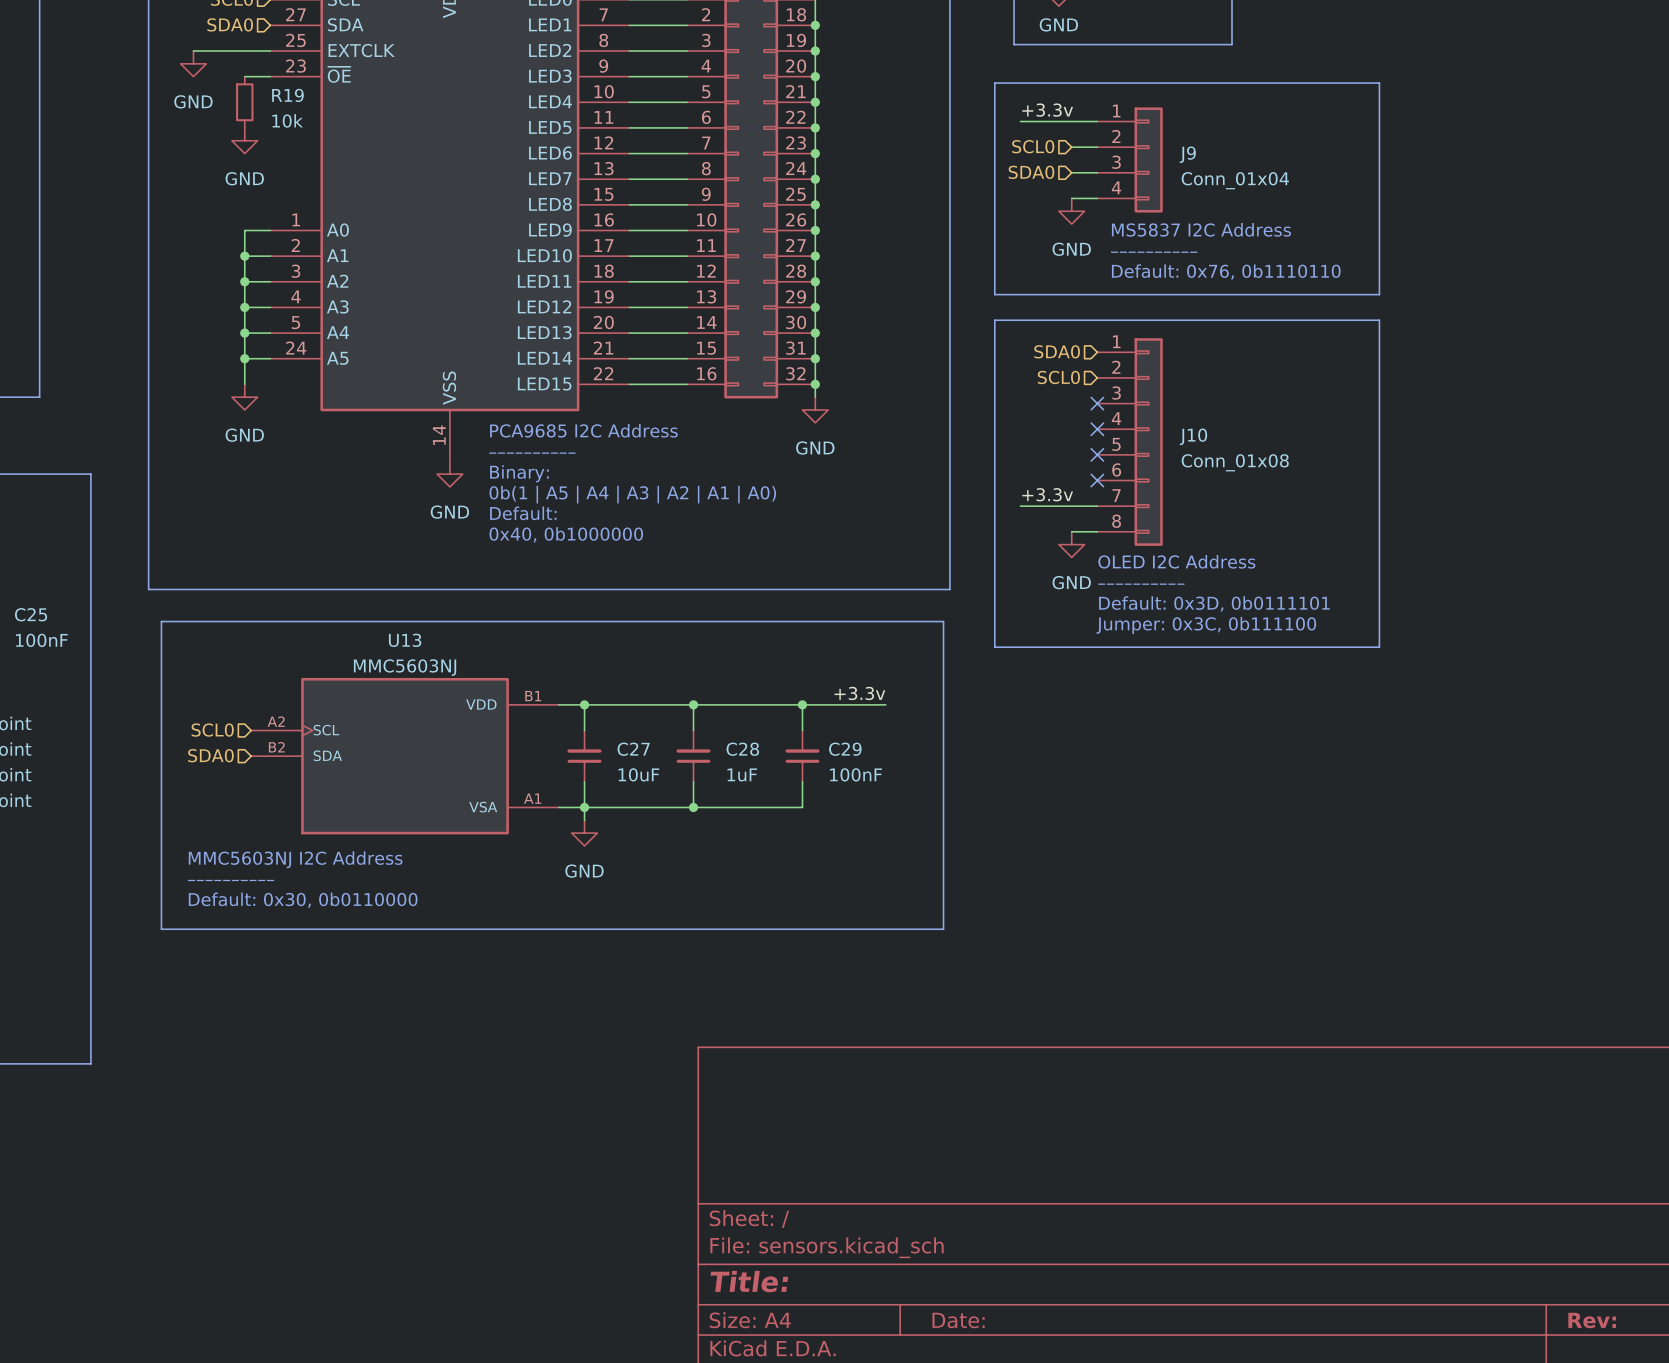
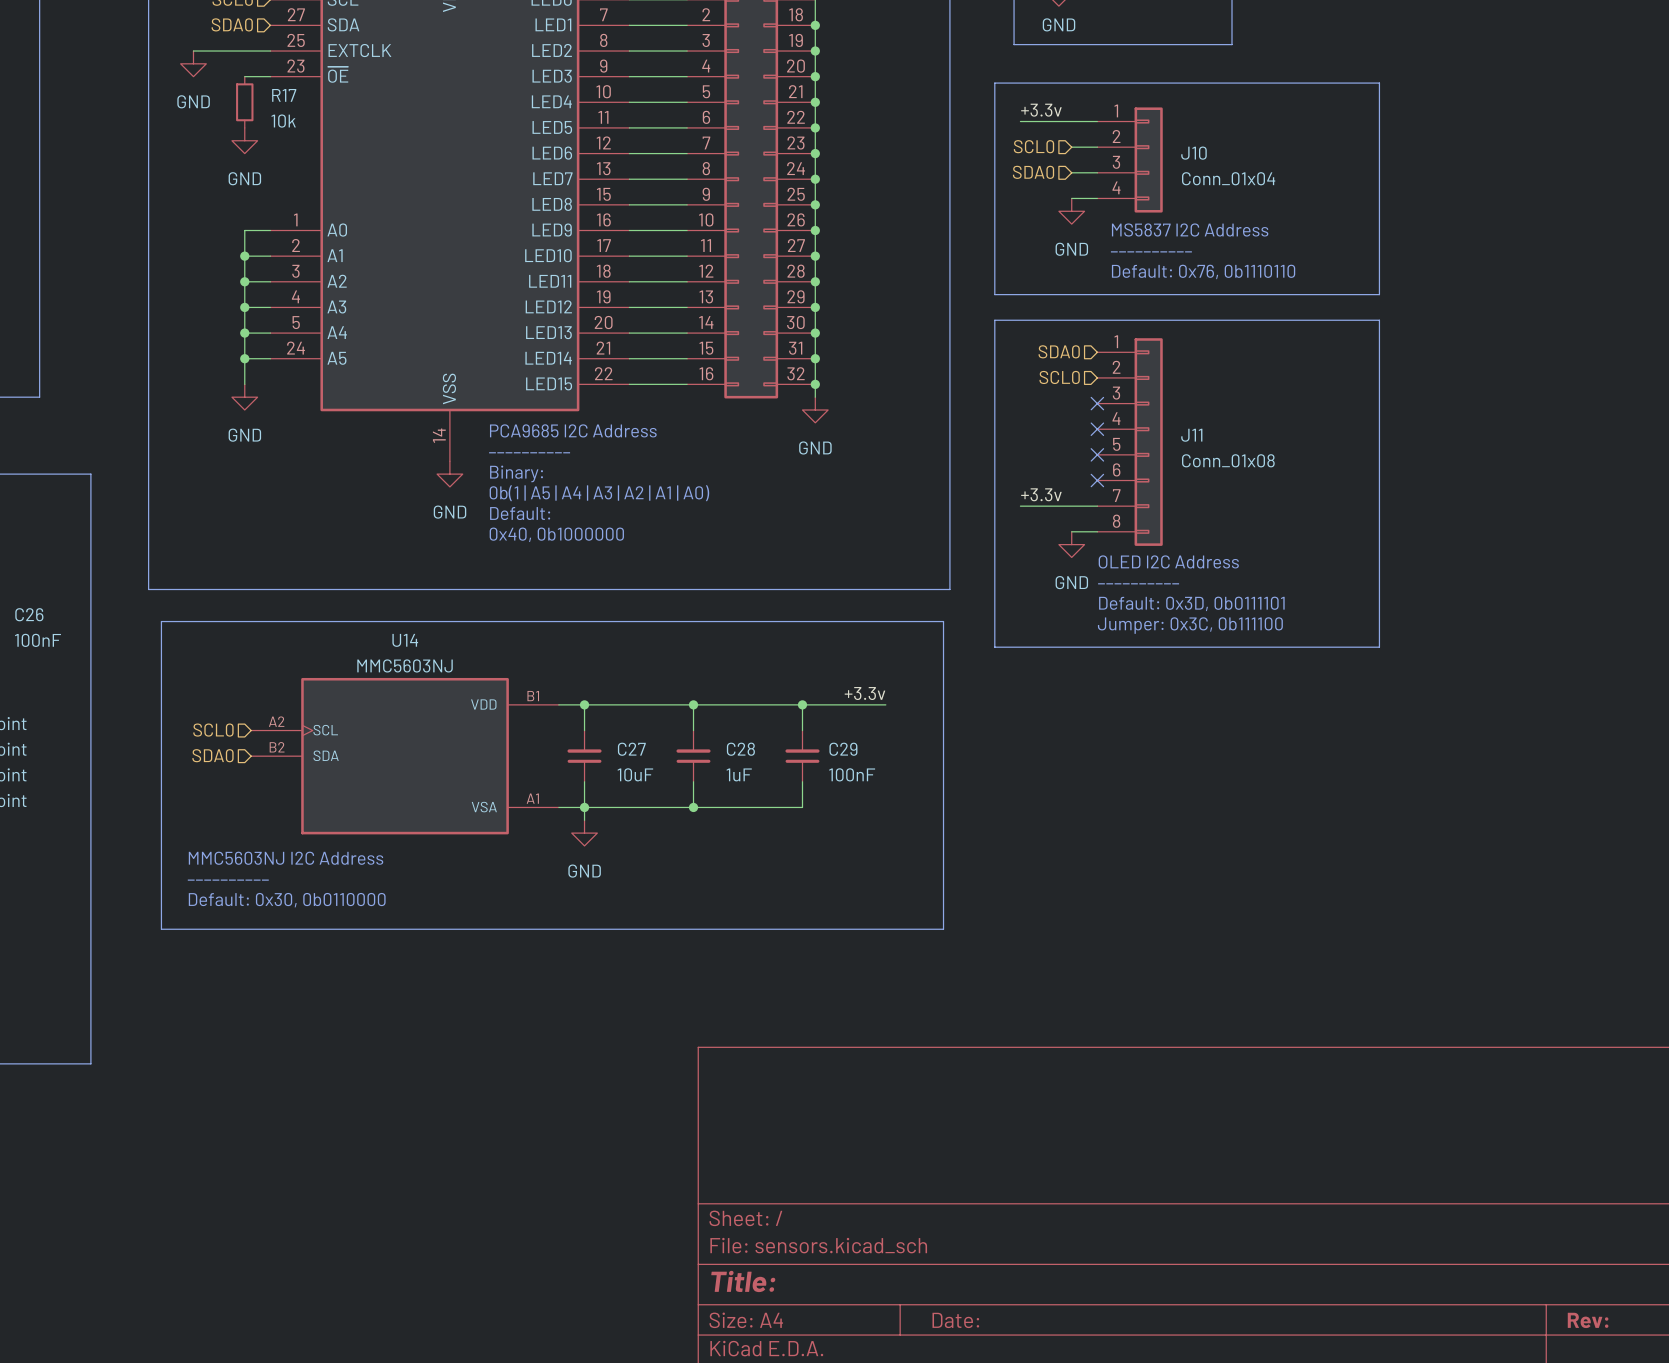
R19 name: R19 (287, 95) -> R17 (284, 95)
J9 name: J9 (1187, 154) -> J10 (1193, 153)
J10 name: J10 (1193, 436) -> J11 (1191, 435)
C25 name: C25 (31, 614) -> C26 (29, 614)
U13 name: U13 (405, 640) -> U14 (405, 640)

